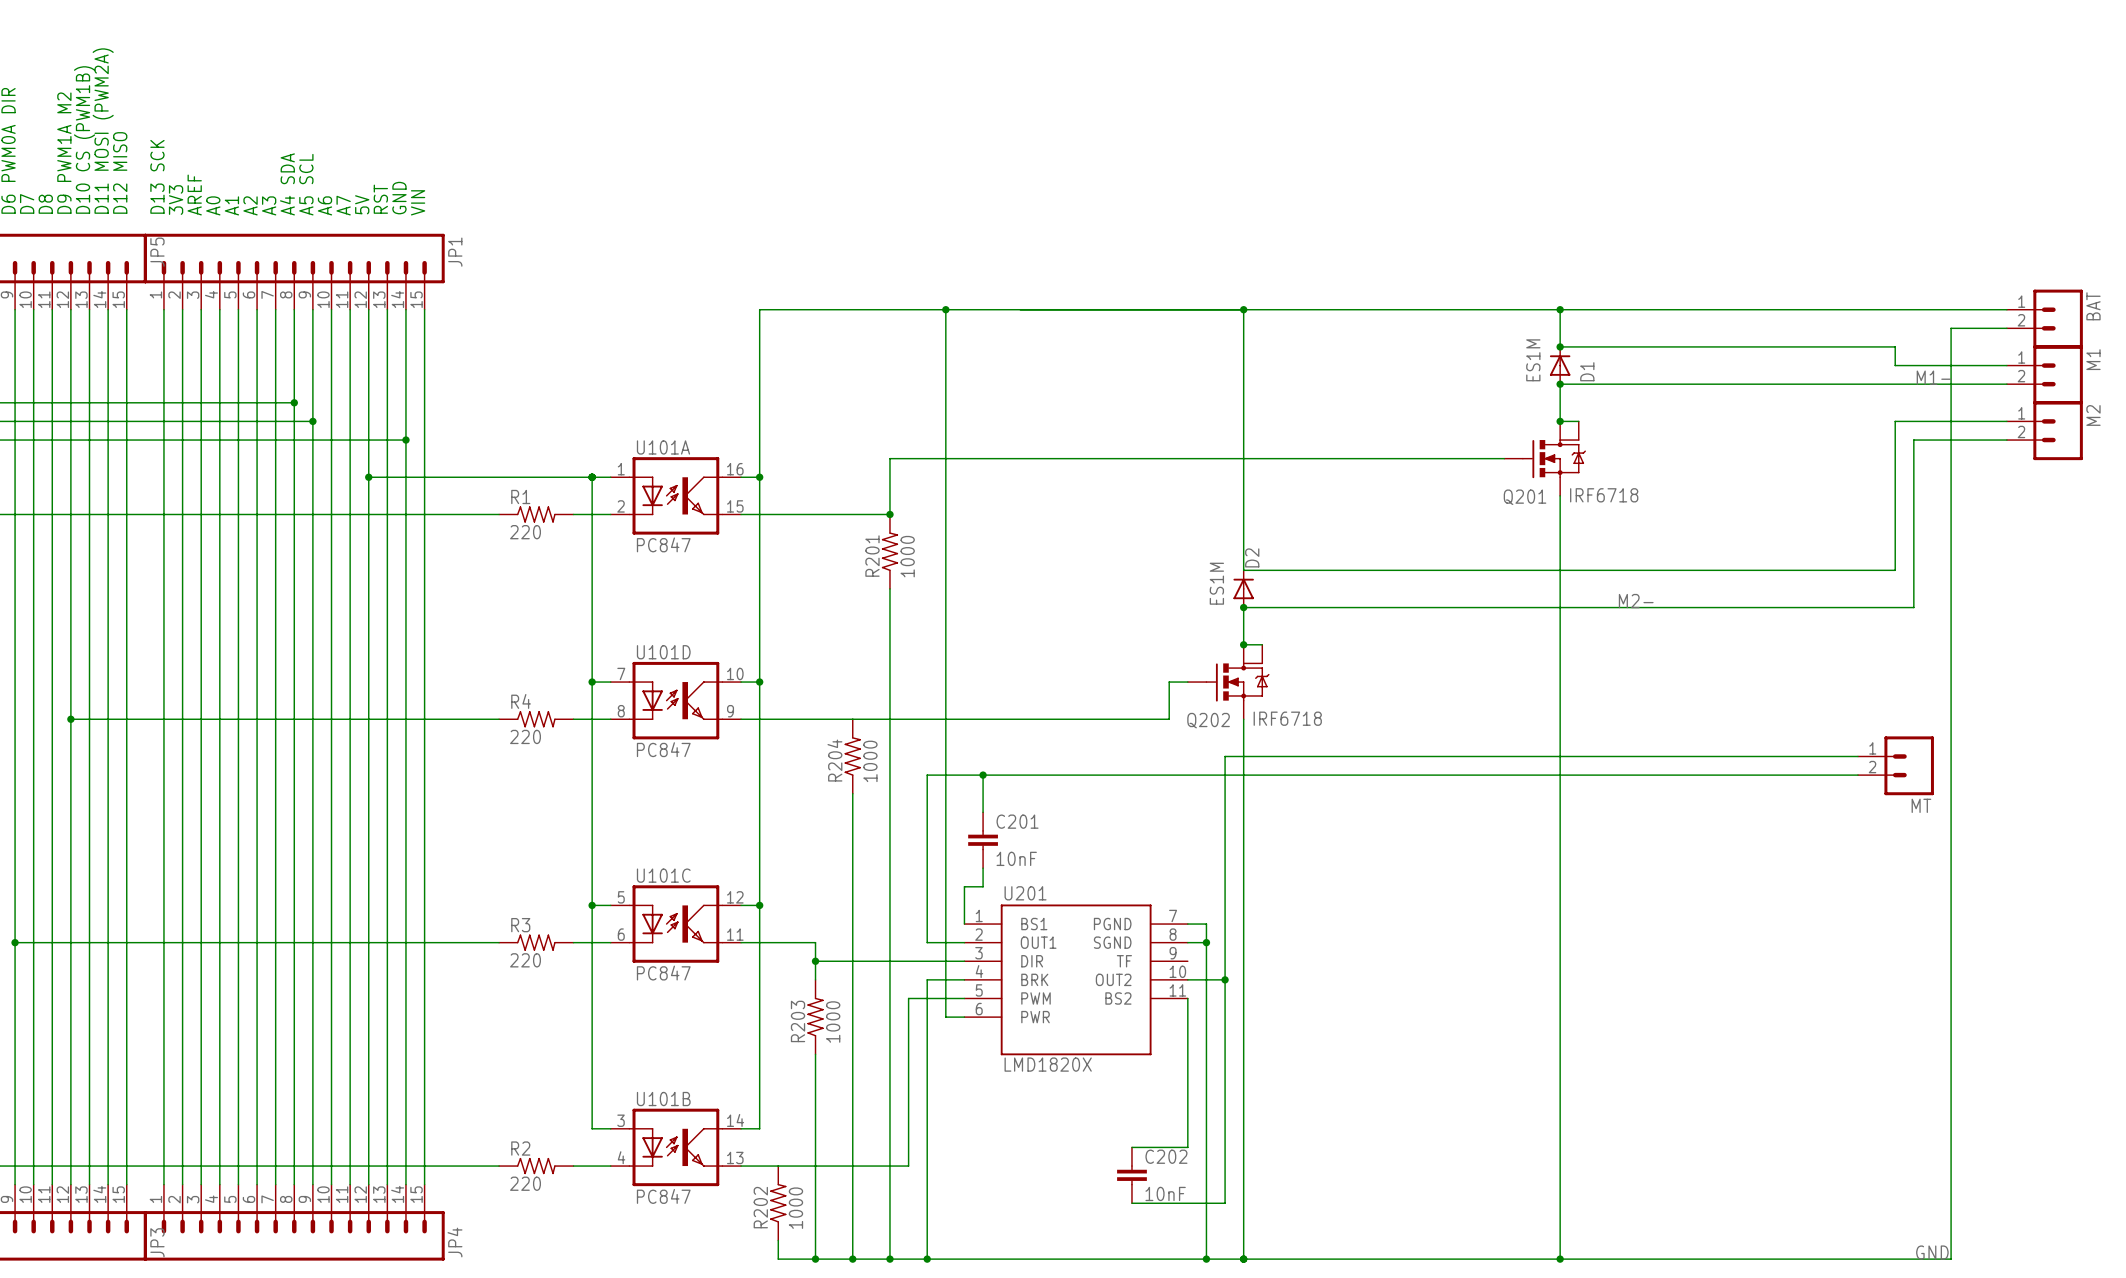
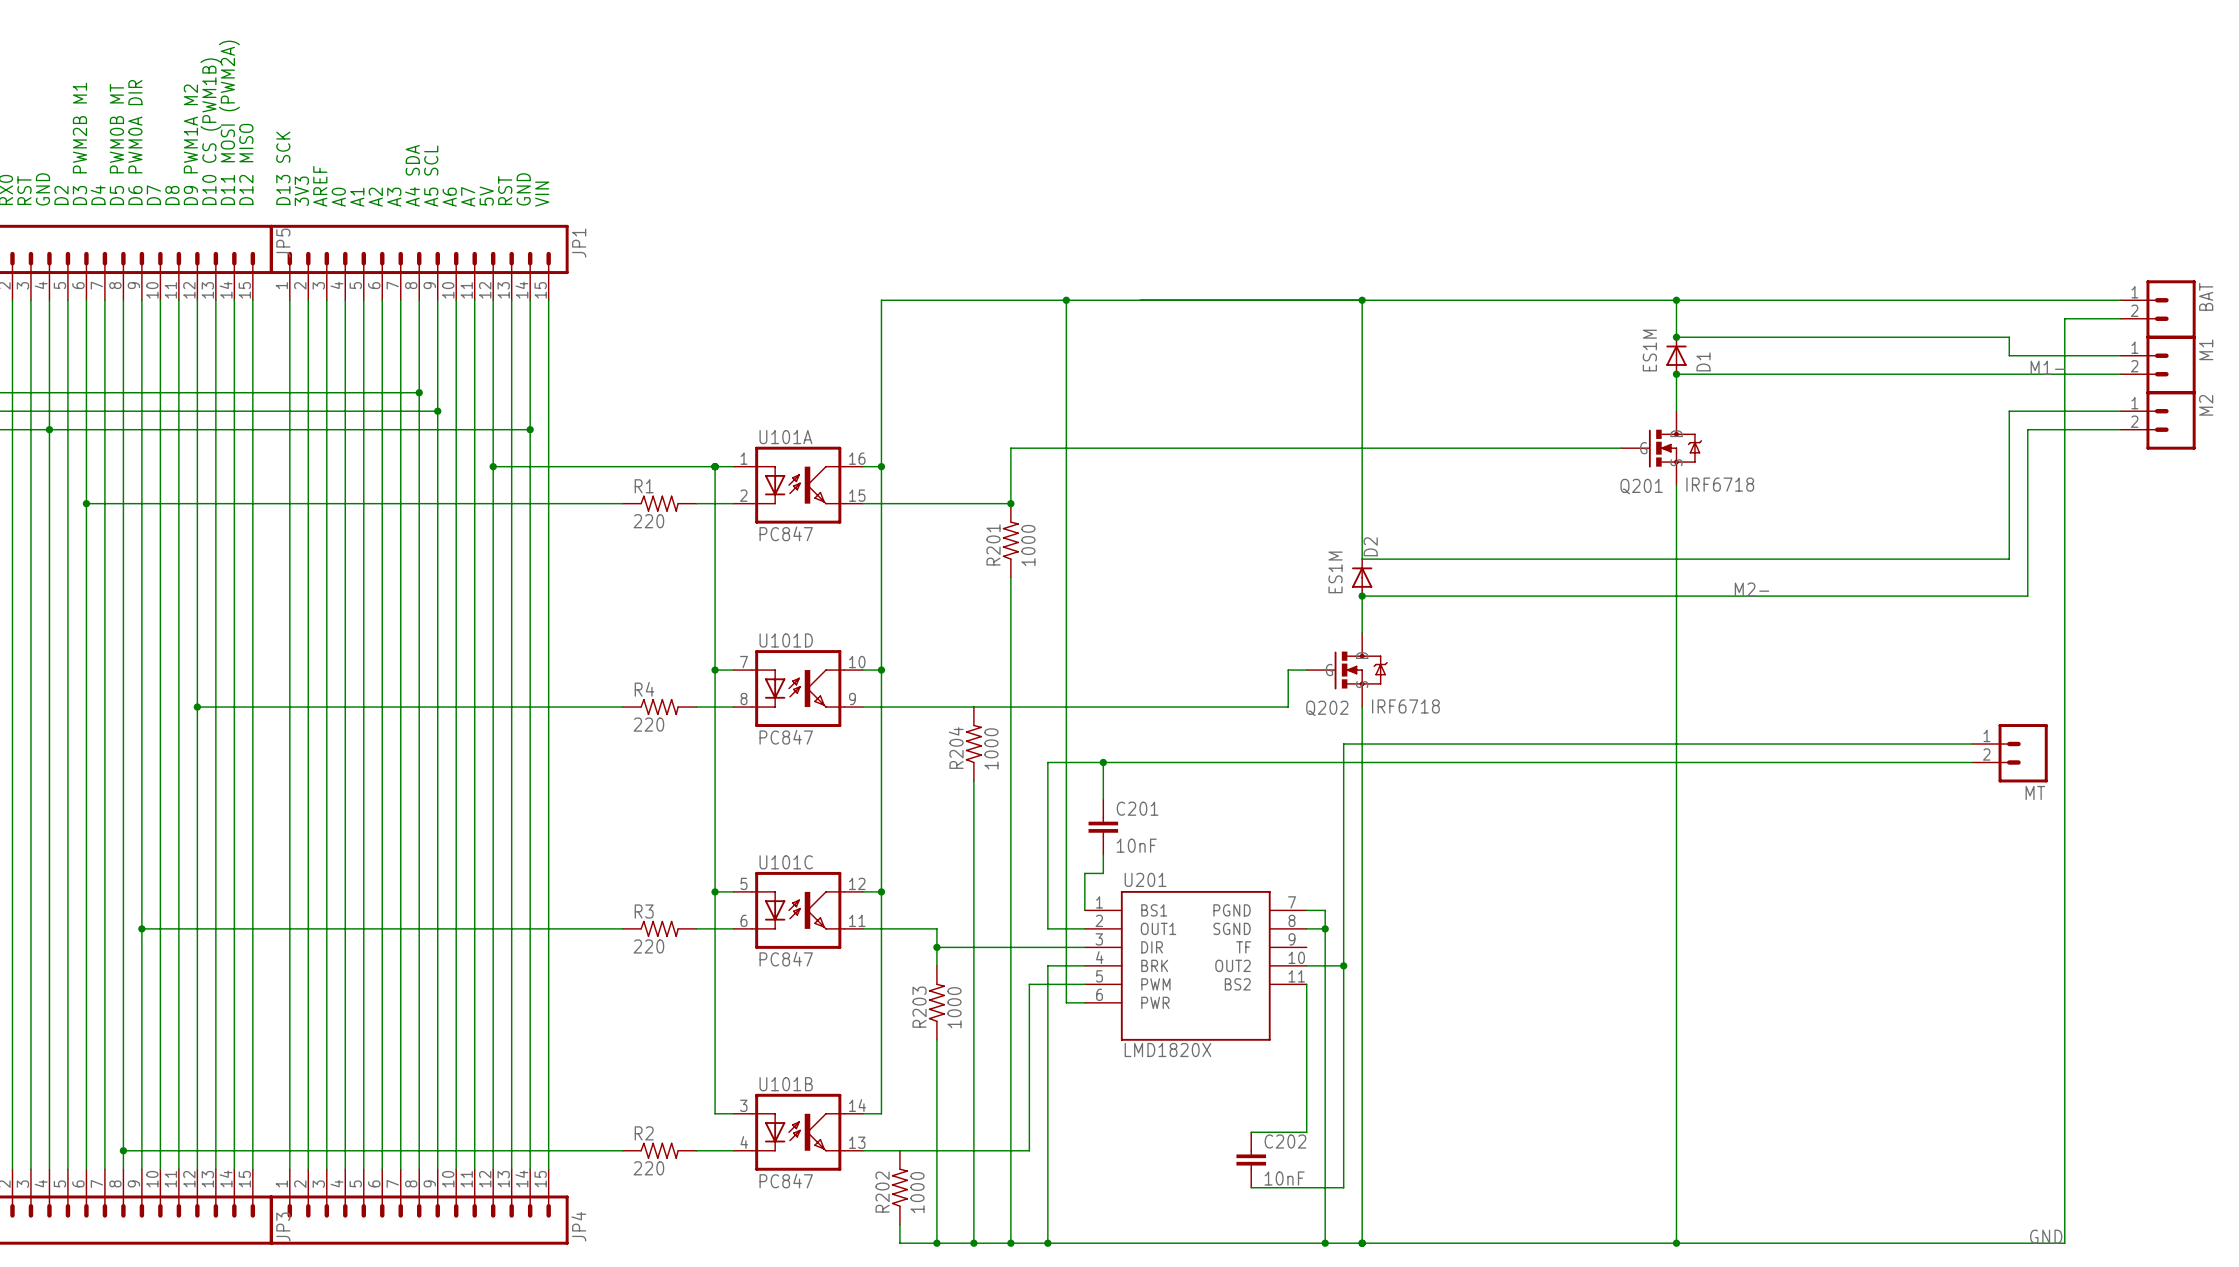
Q201 symbol: [1504, 421, 1586, 496] -> [1620, 410, 1702, 486]
wire: (1560, 421) (1578, 421) -> none
junction: (1560, 421) -> none
Q202 symbol: [1187, 644, 1270, 720] -> [1306, 632, 1388, 708]
wire: (1243, 644) (1262, 644) -> none
junction: (1243, 644) -> none

